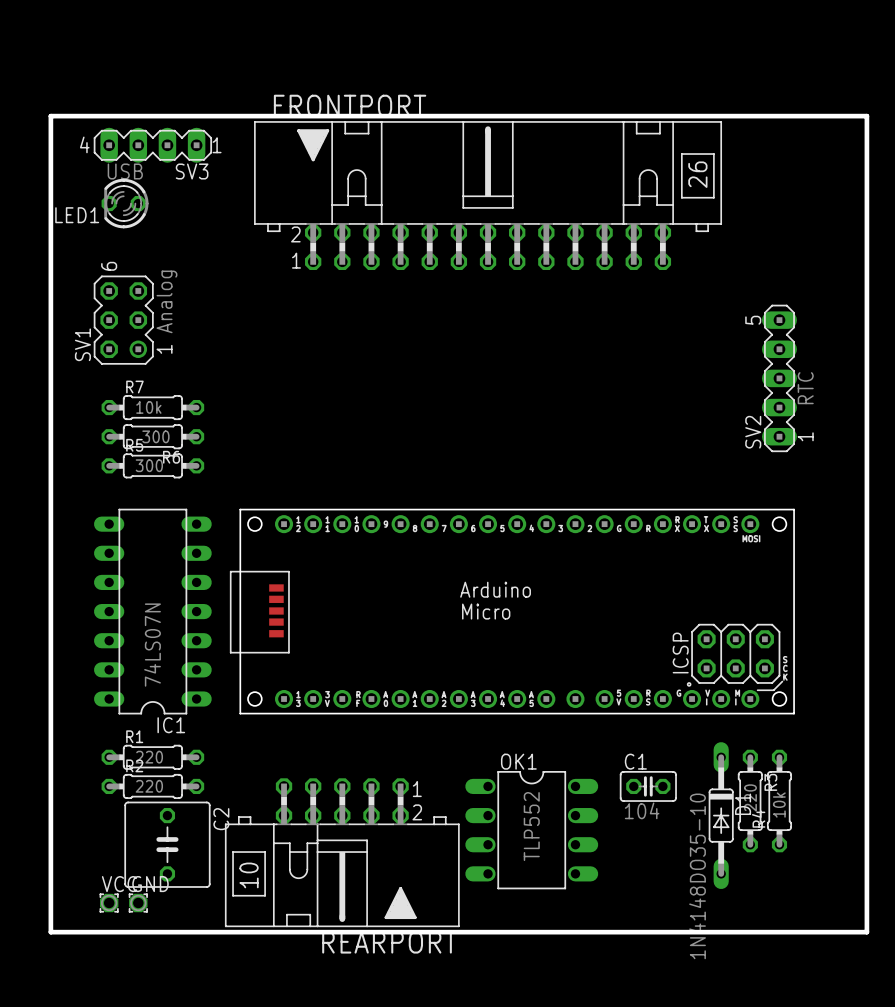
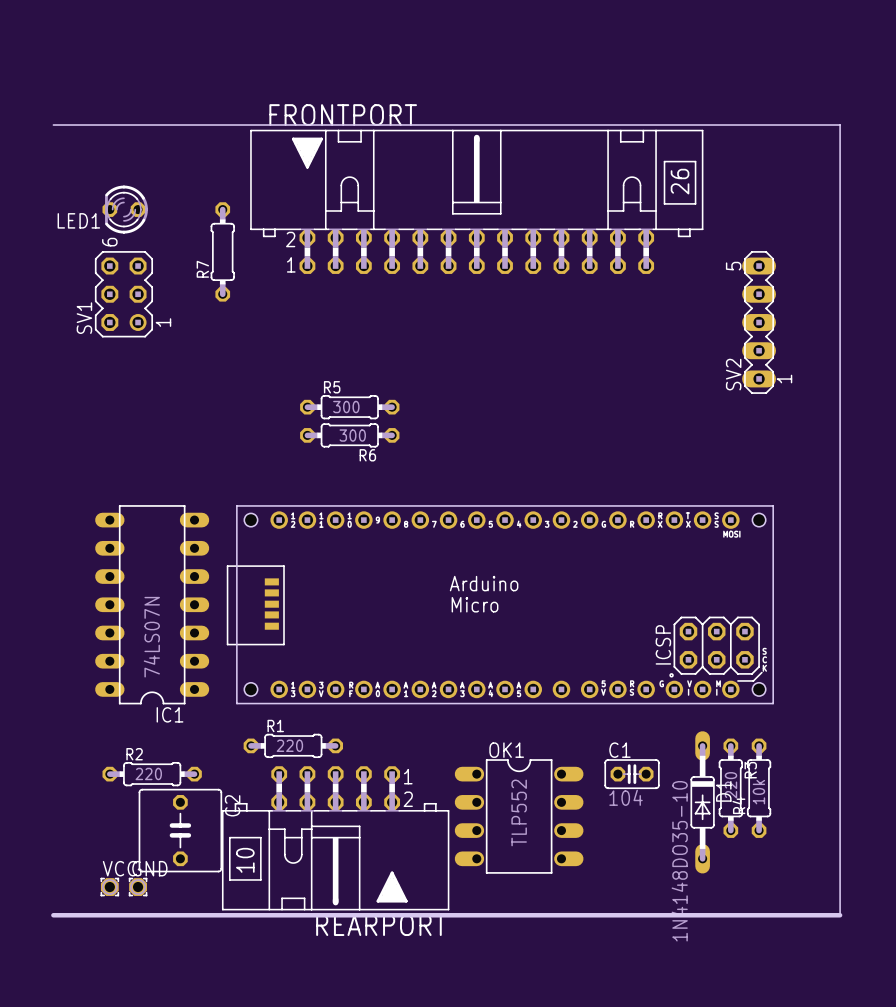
SV3: USB (152, 145) -> none
SV1 value: Analog (166, 301) -> none
SV1 position: (123, 320) -> (123, 294)
SV2 position: (779, 378) -> (759, 322)
R7 name position: R7 (134, 387) -> R7 (202, 269)
SV2 value: RTC (805, 388) -> none
R7 value: 10k (148, 407) -> none
R7 rotation: 0° (152, 407) -> 90° clockwise (222, 251)
R7 position: (152, 407) -> (222, 251)
R6 position: (152, 436) -> (349, 435)
R5 position: (152, 465) -> (349, 407)
R1 position: (152, 757) -> (293, 745)
C2 position: (167, 844) -> (180, 830)
board edge: (50, 932) (50, 116) (866, 116) (866, 932) (863, 932) -> (53, 125) (840, 125) (840, 915)

